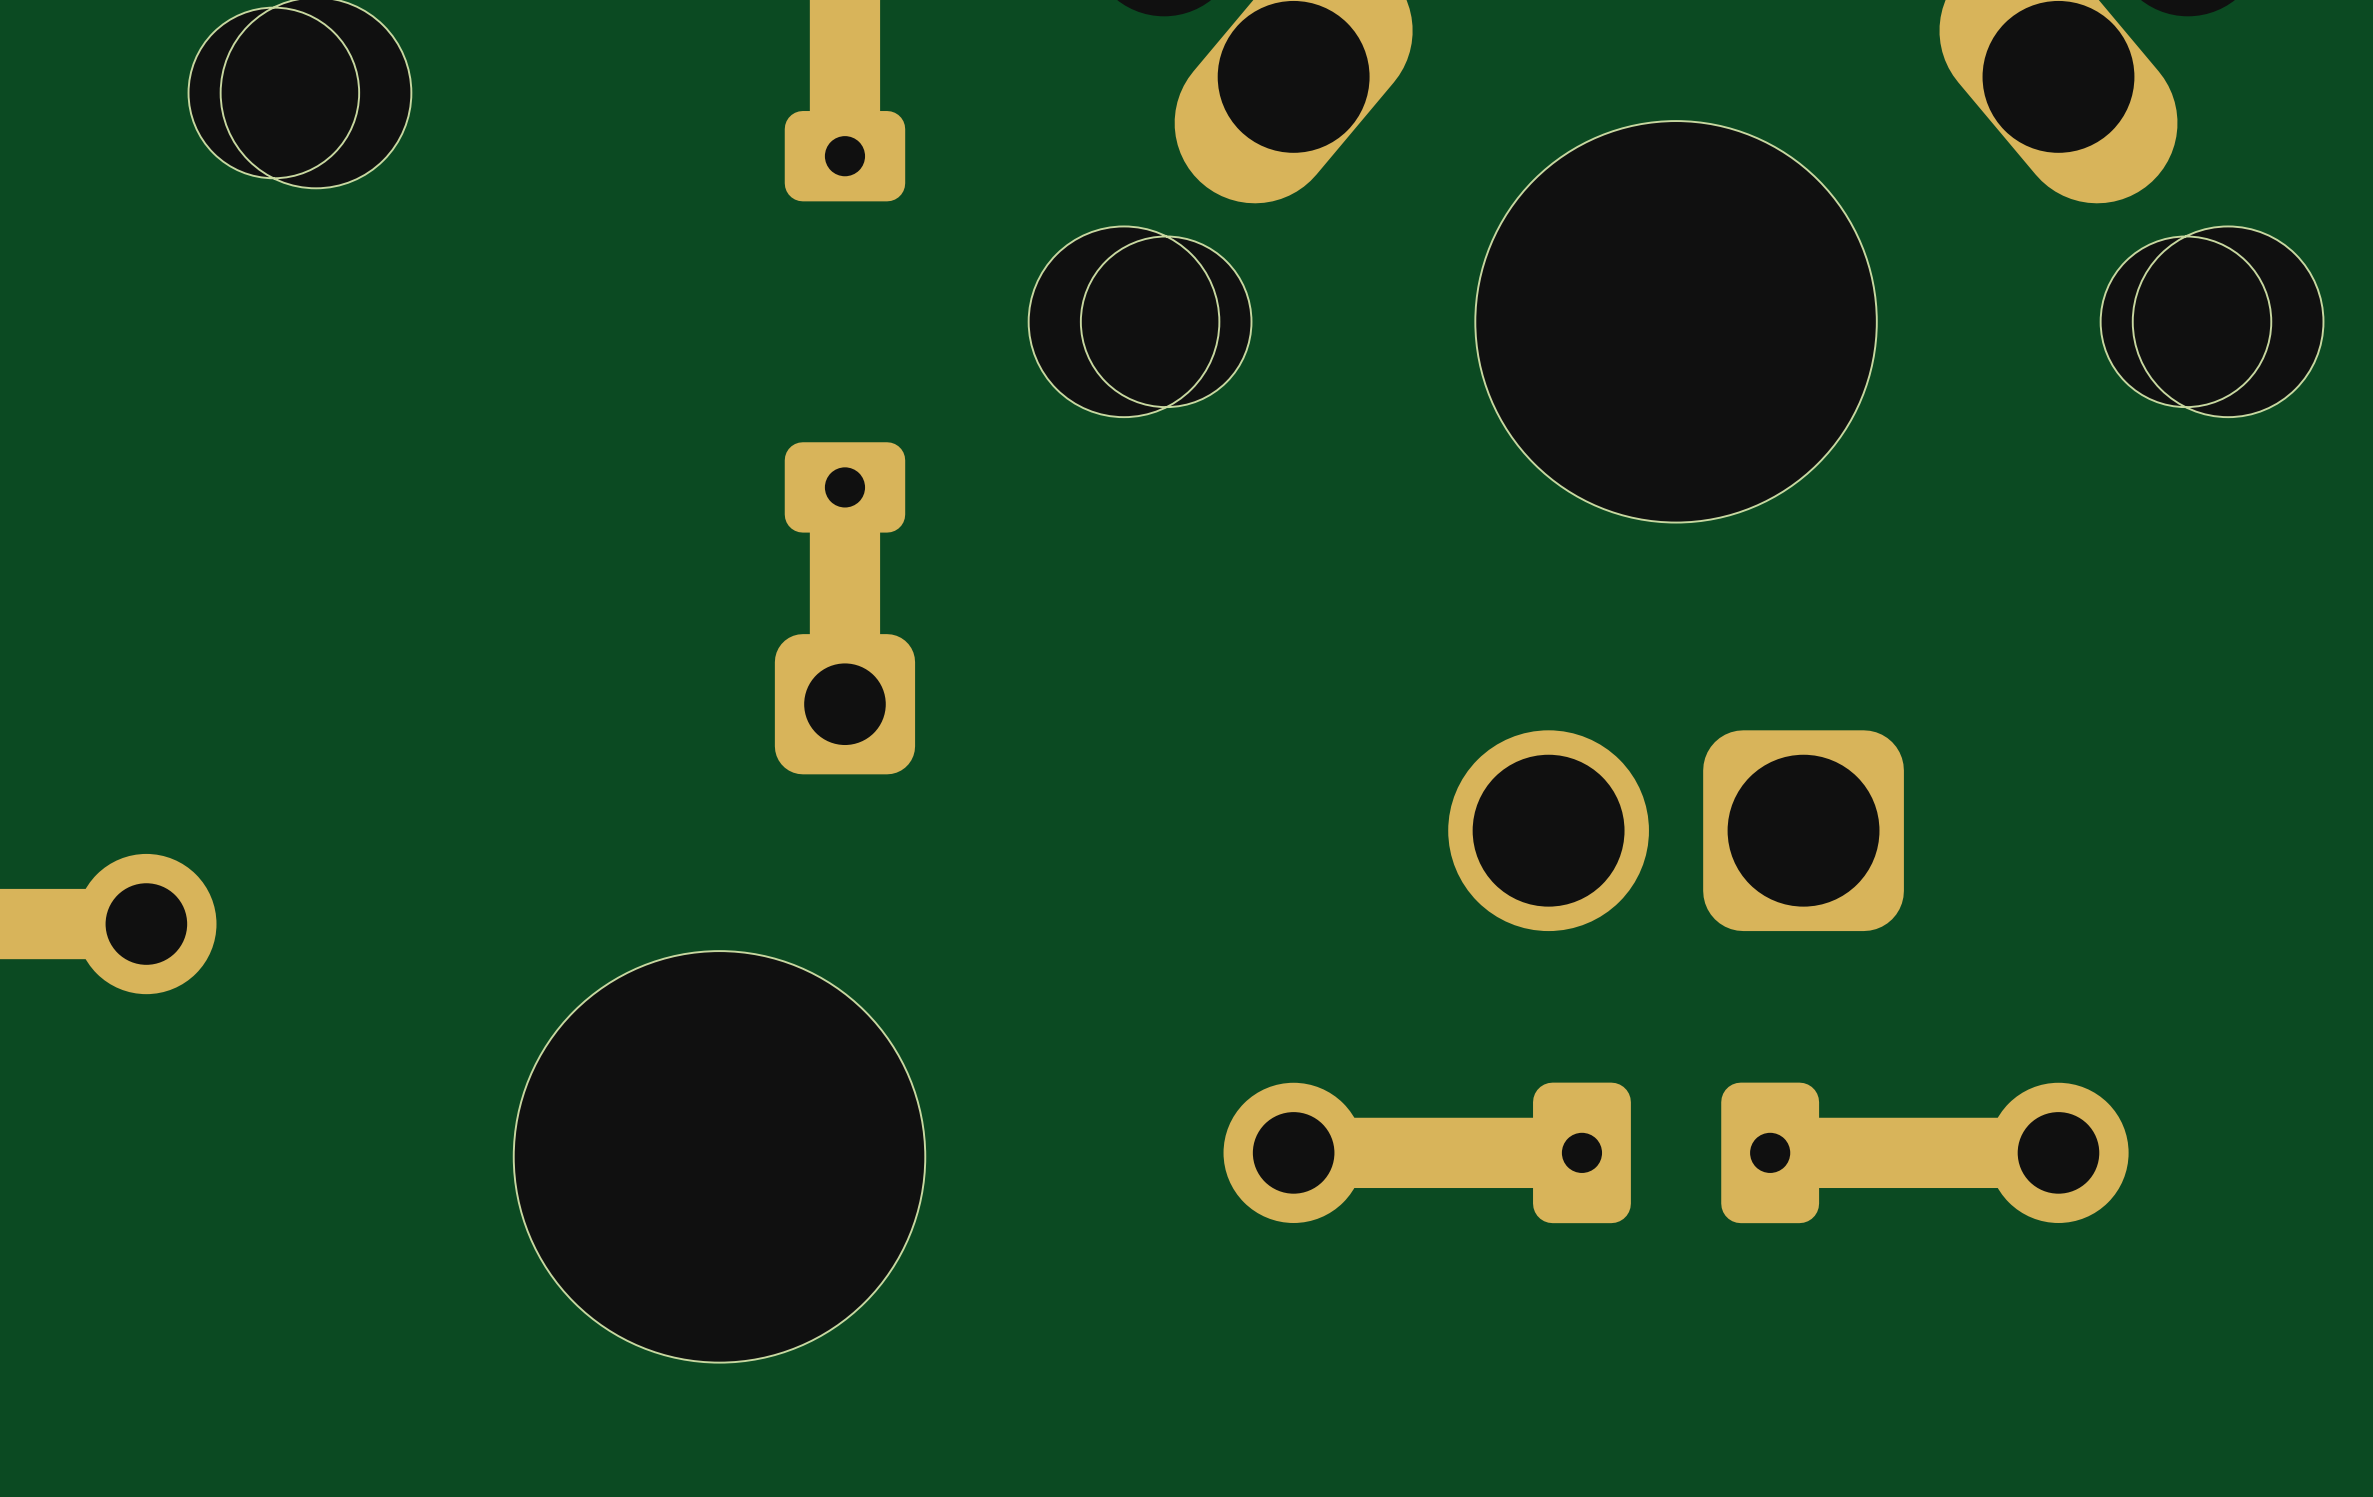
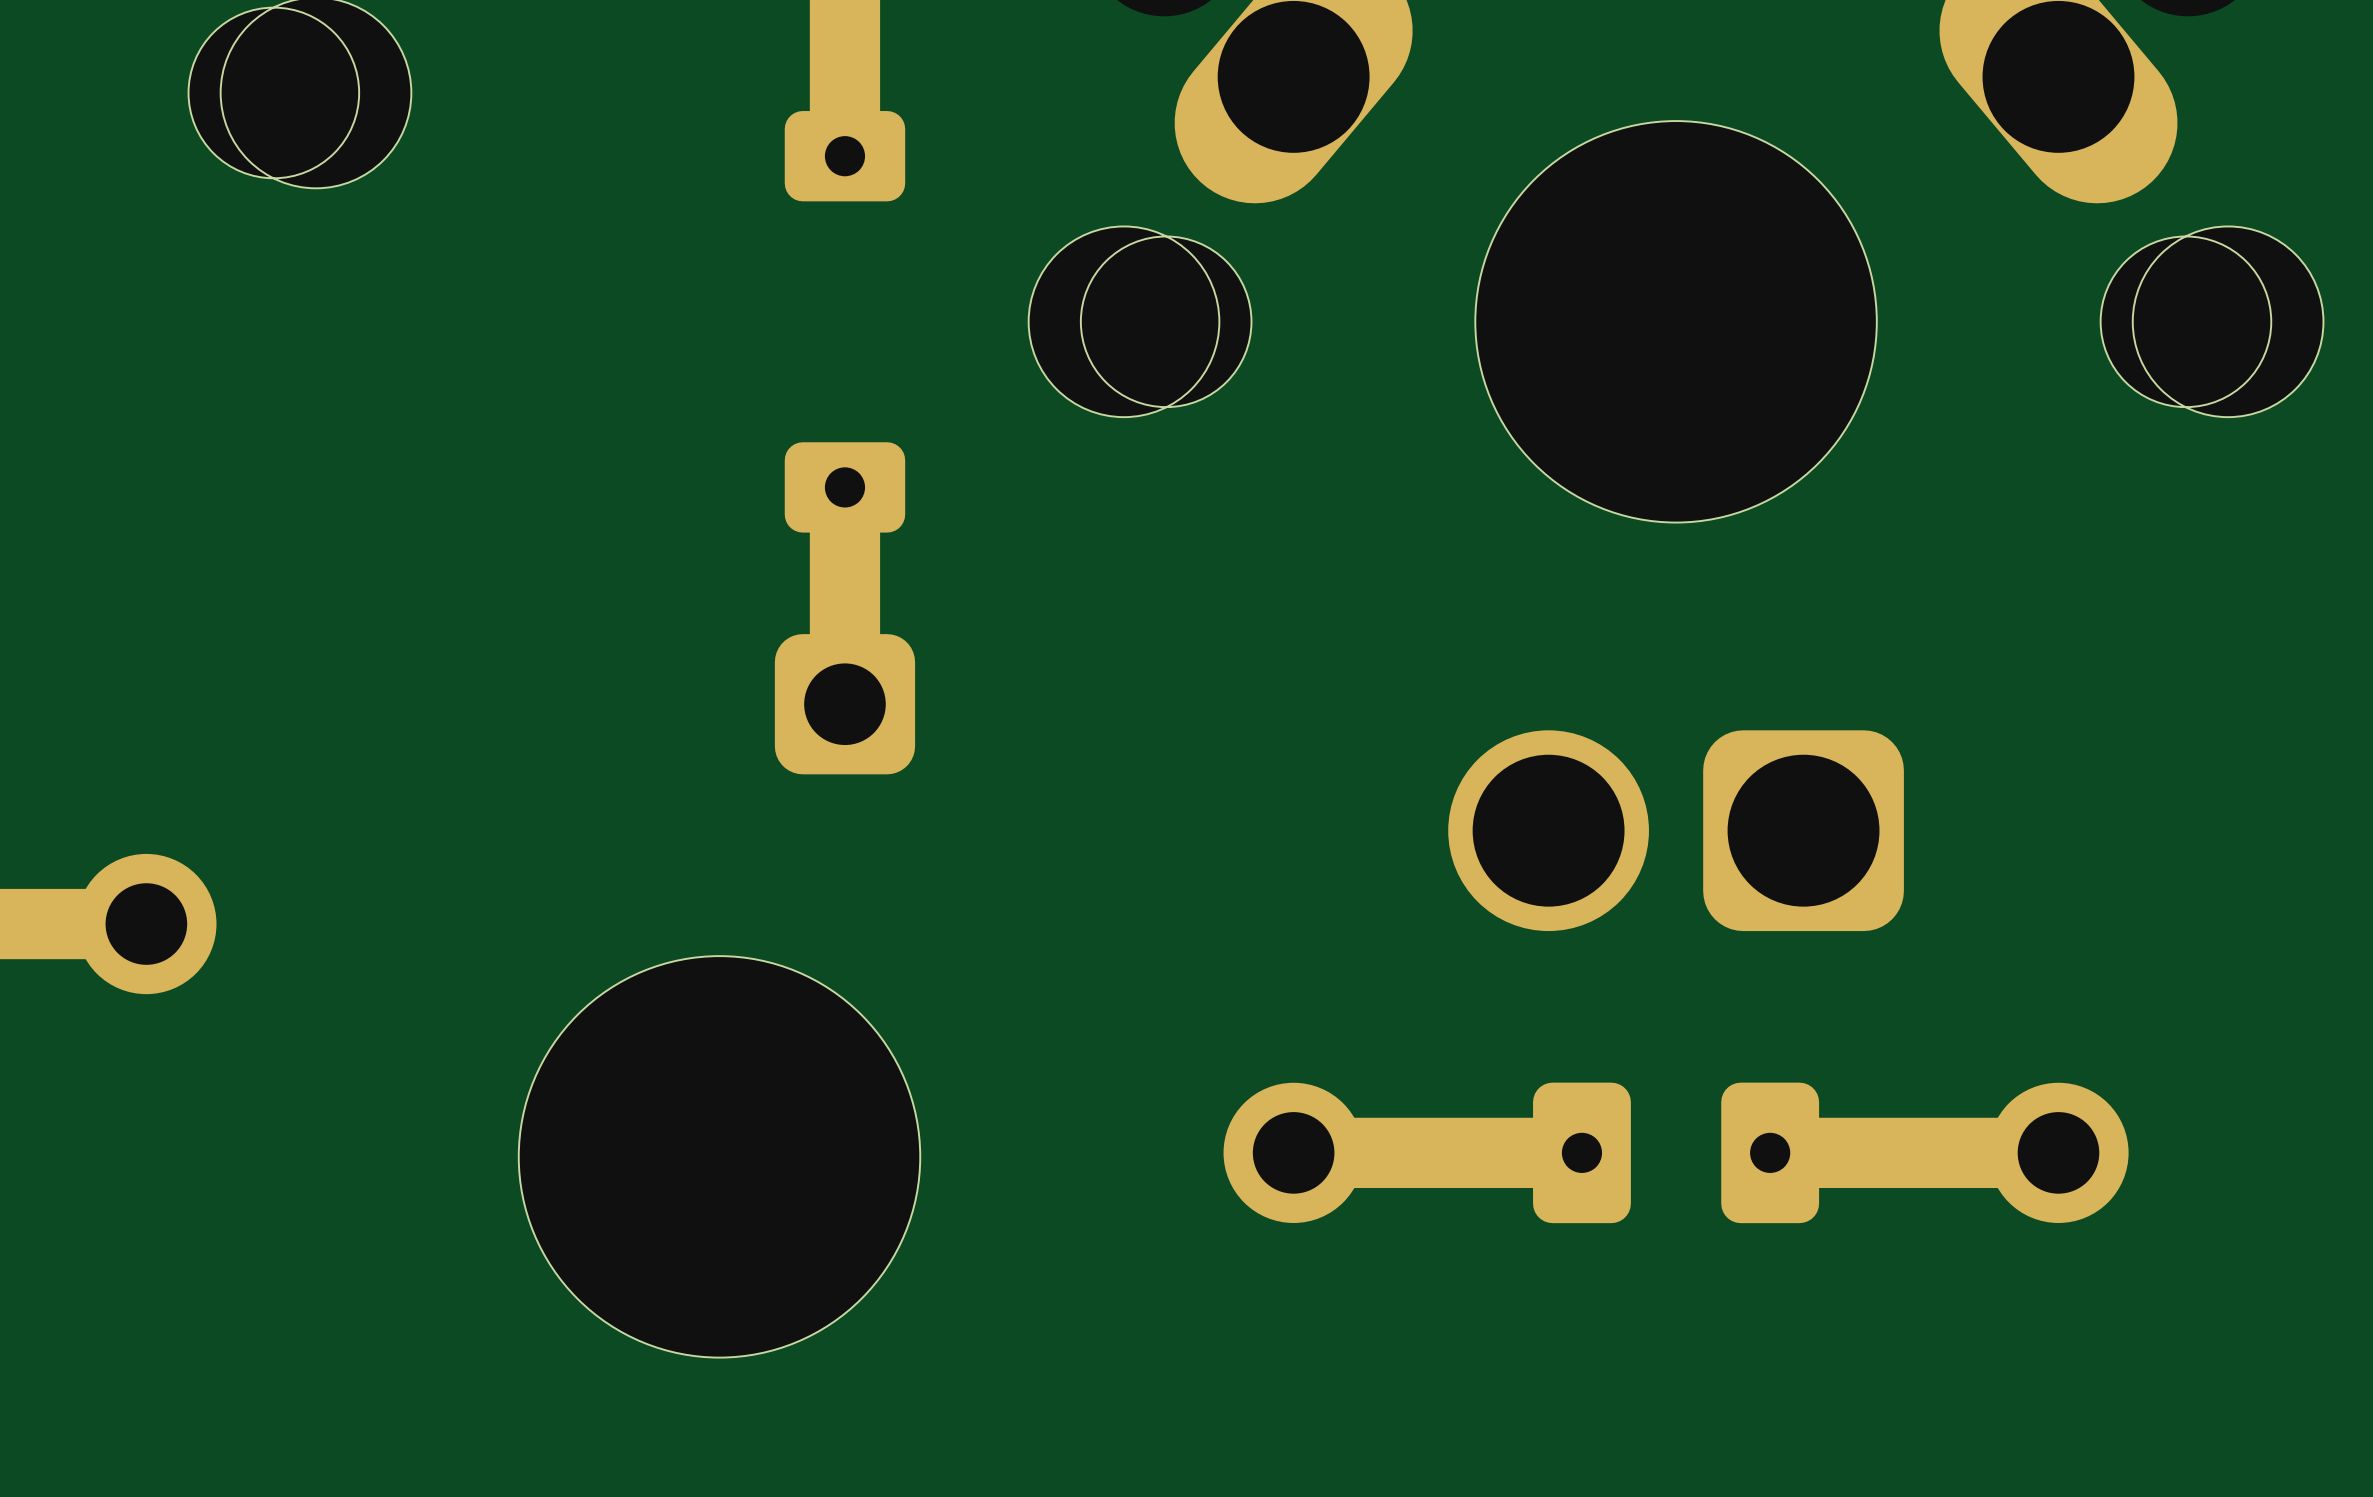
part footprint: [513, 951, 926, 1363] -> [518, 956, 921, 1358]

